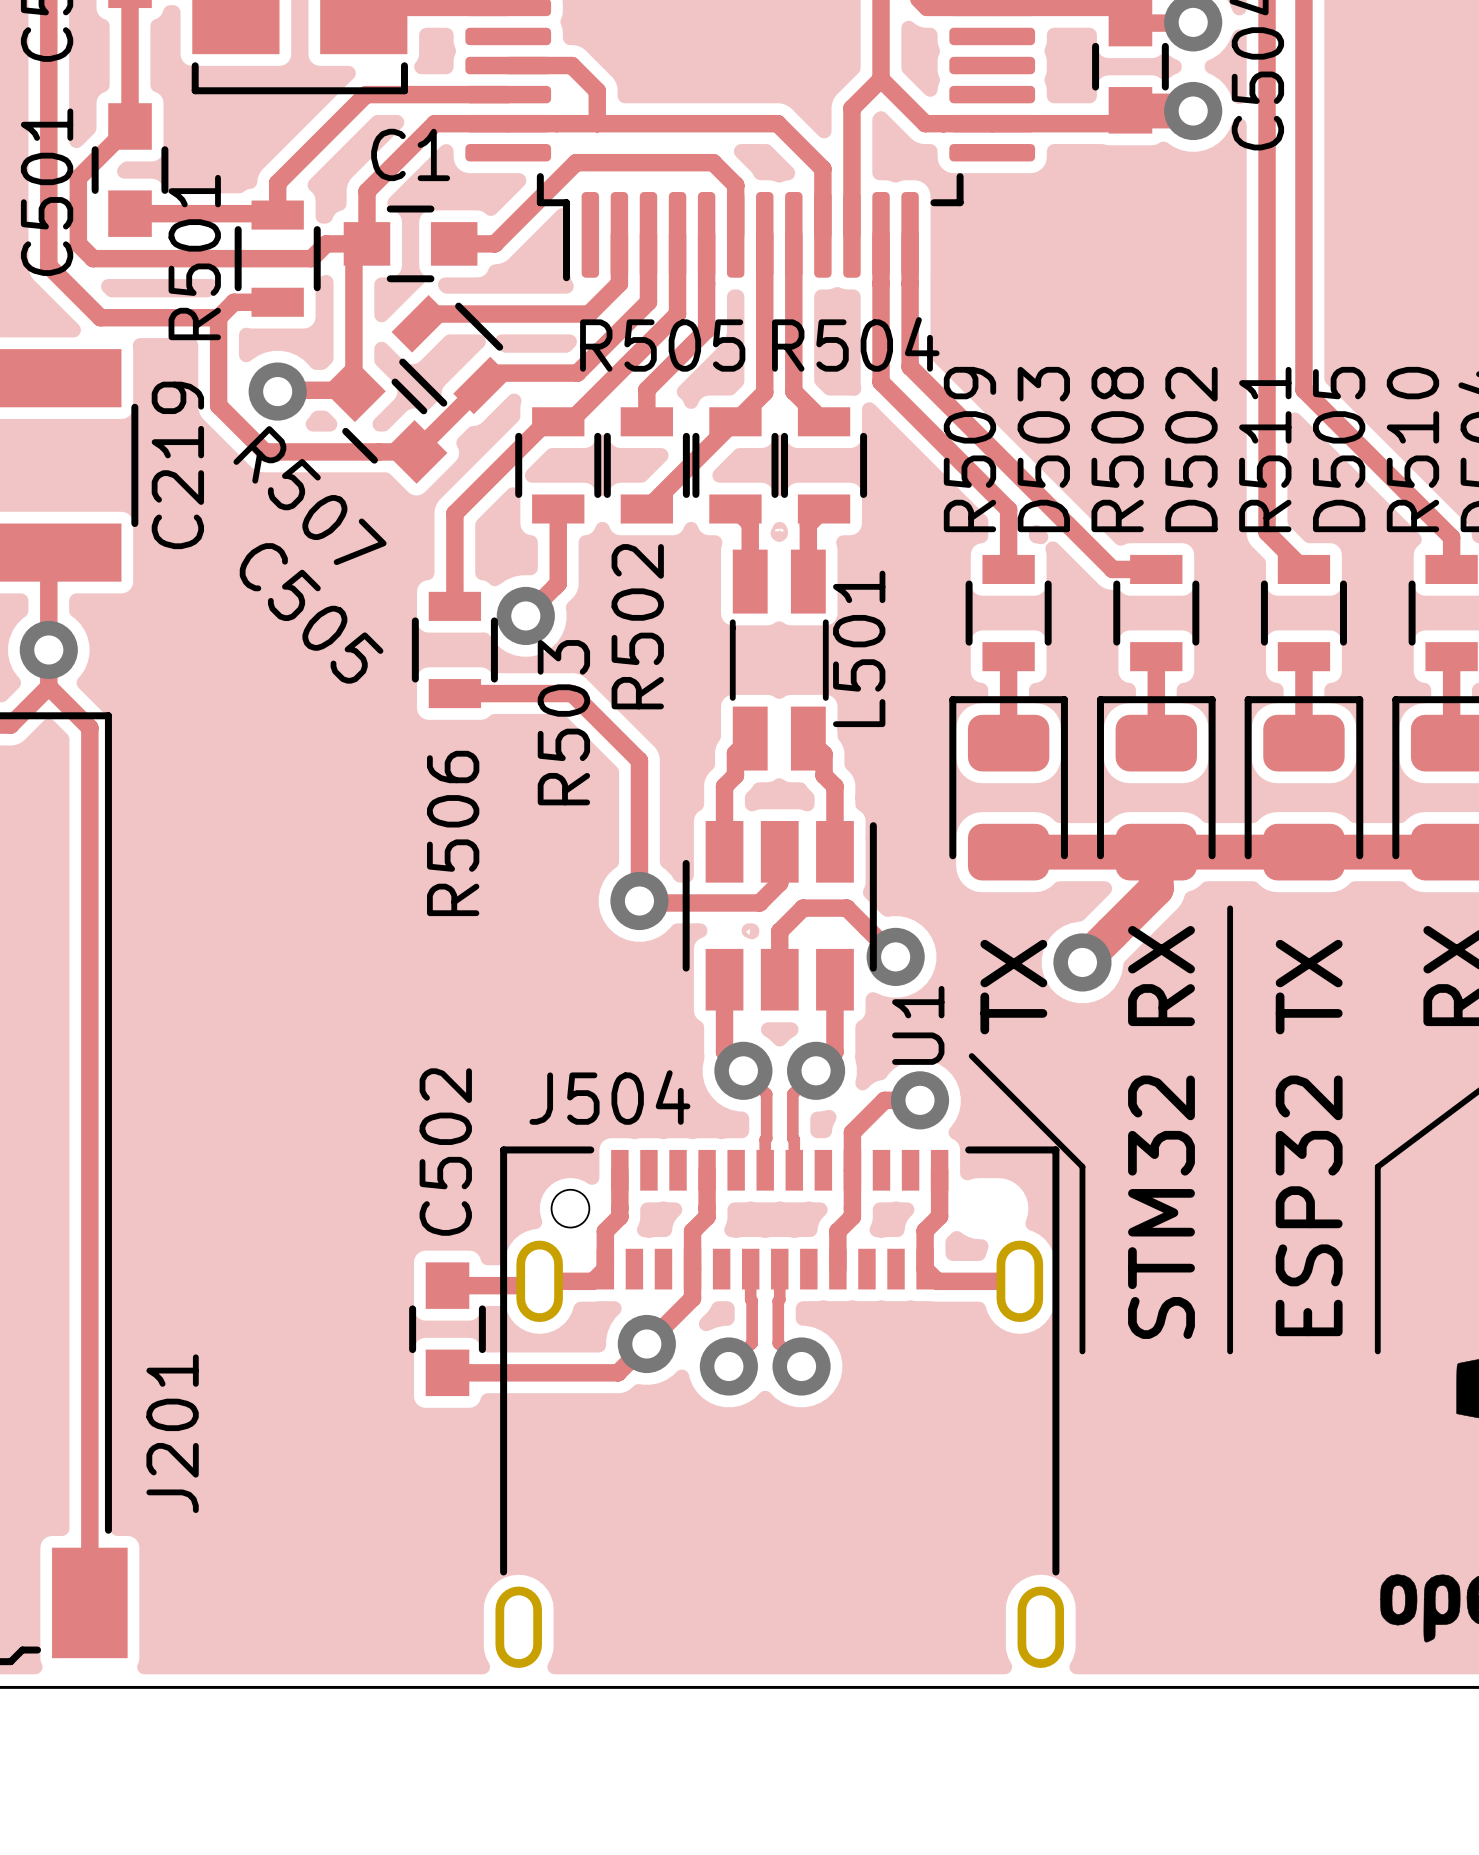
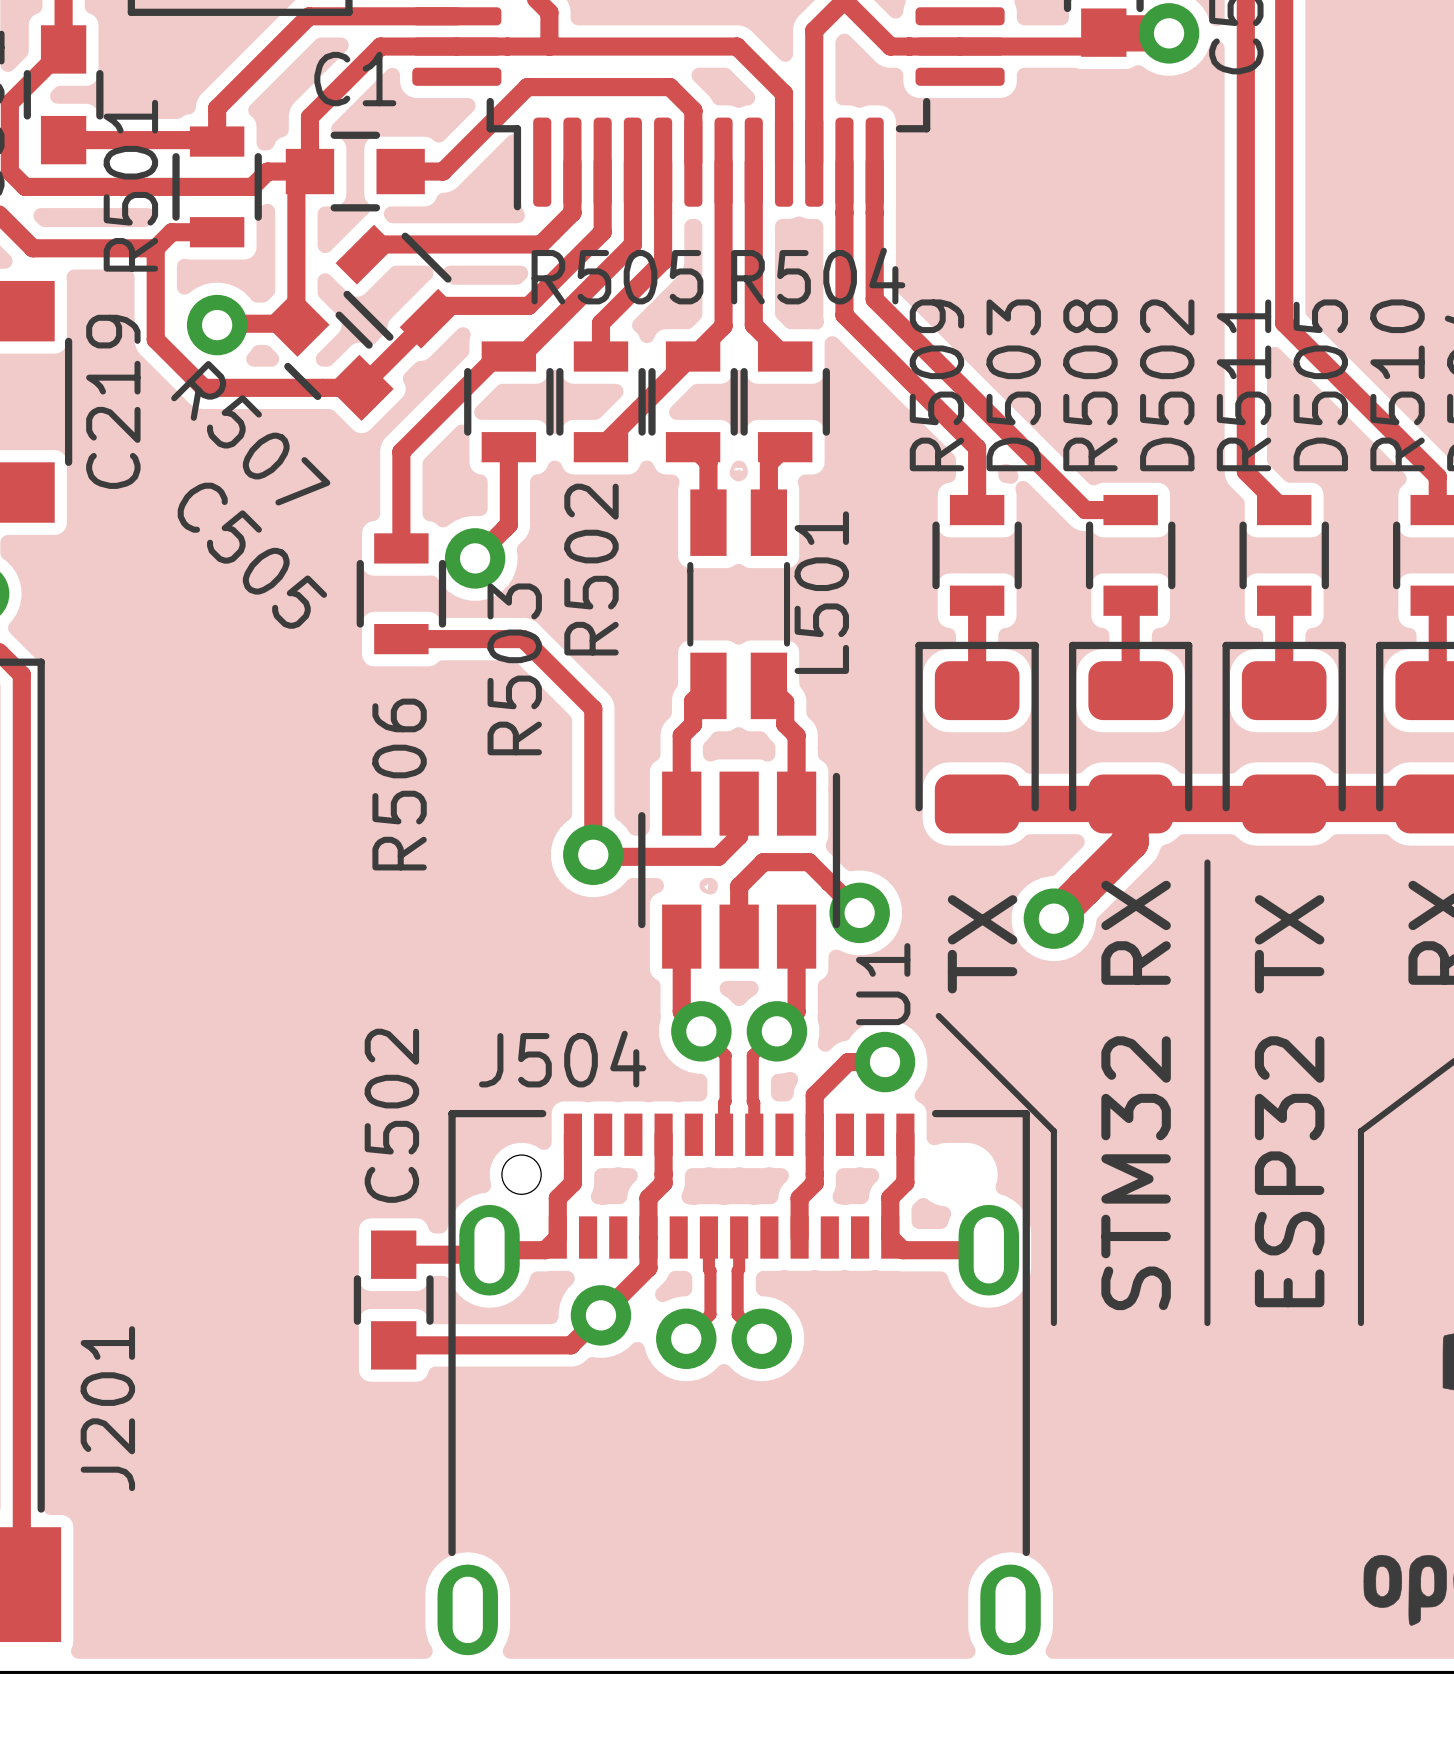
J504 footprint: [495, 1146, 1065, 1668] -> [437, 1109, 1041, 1656]

